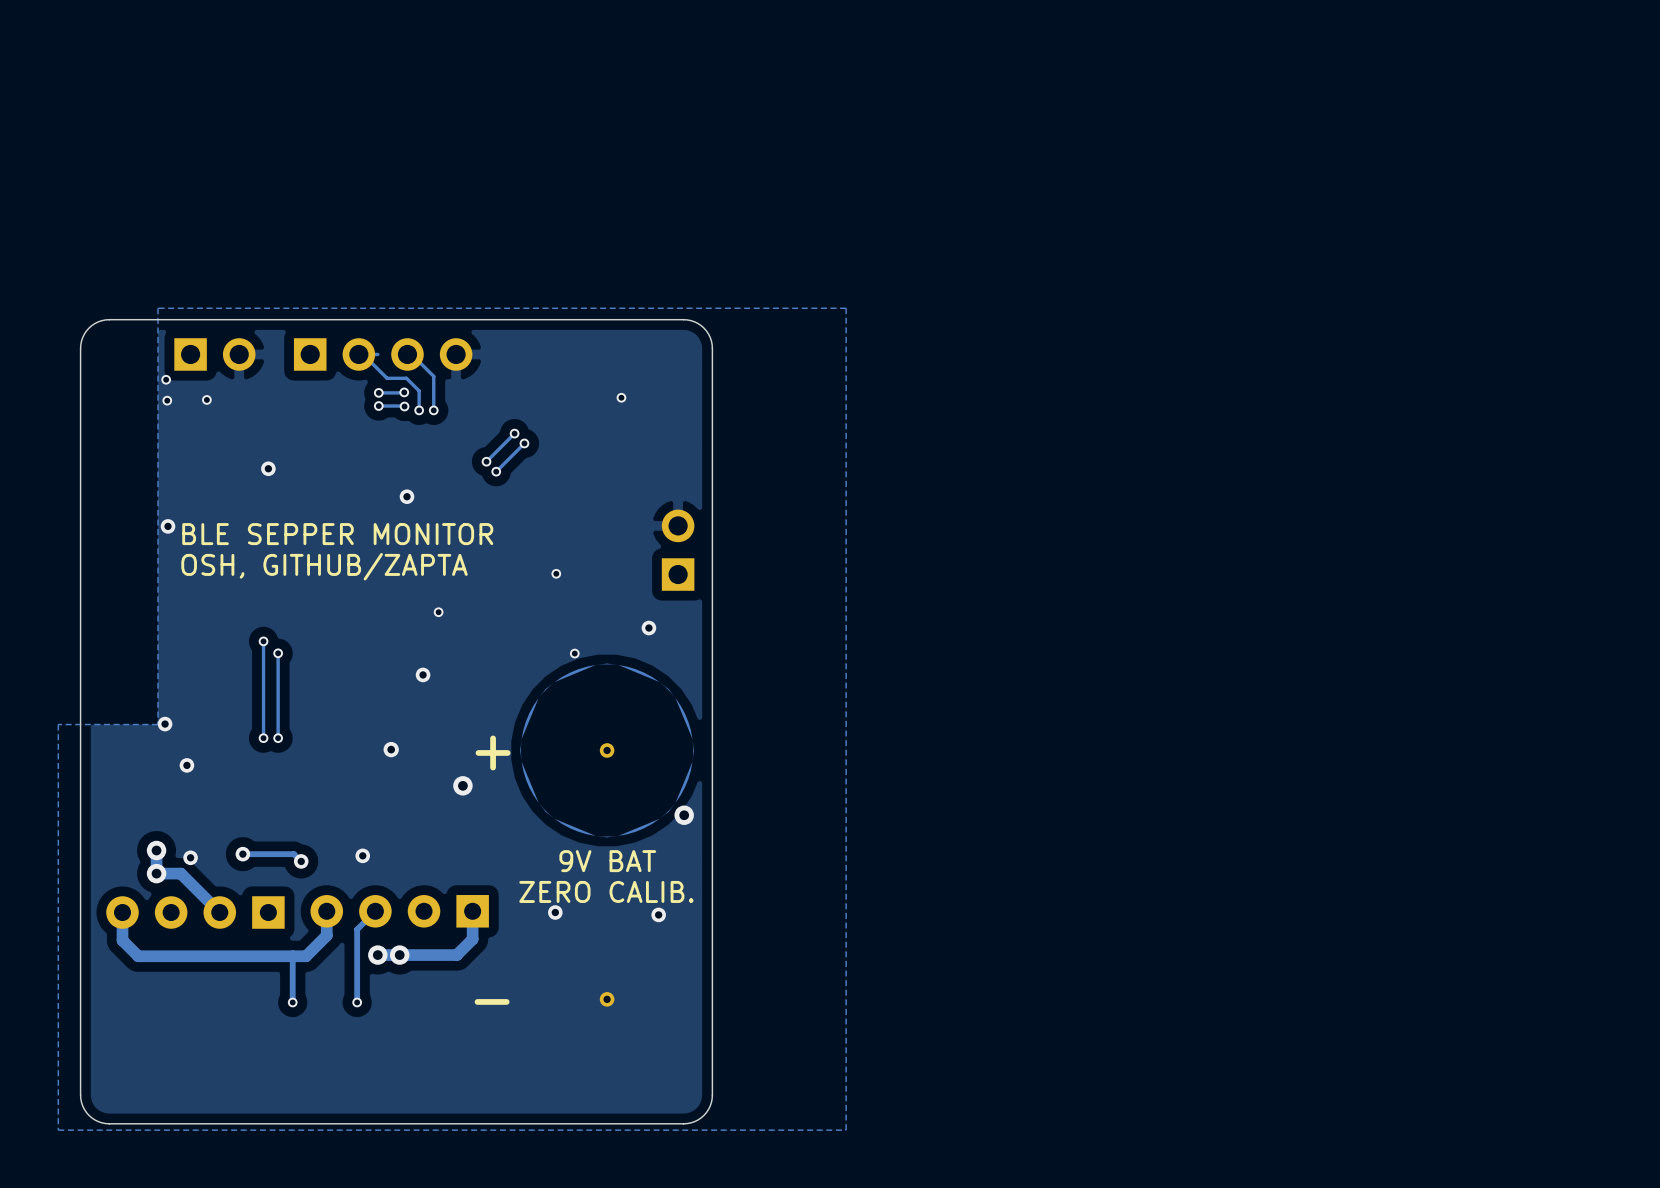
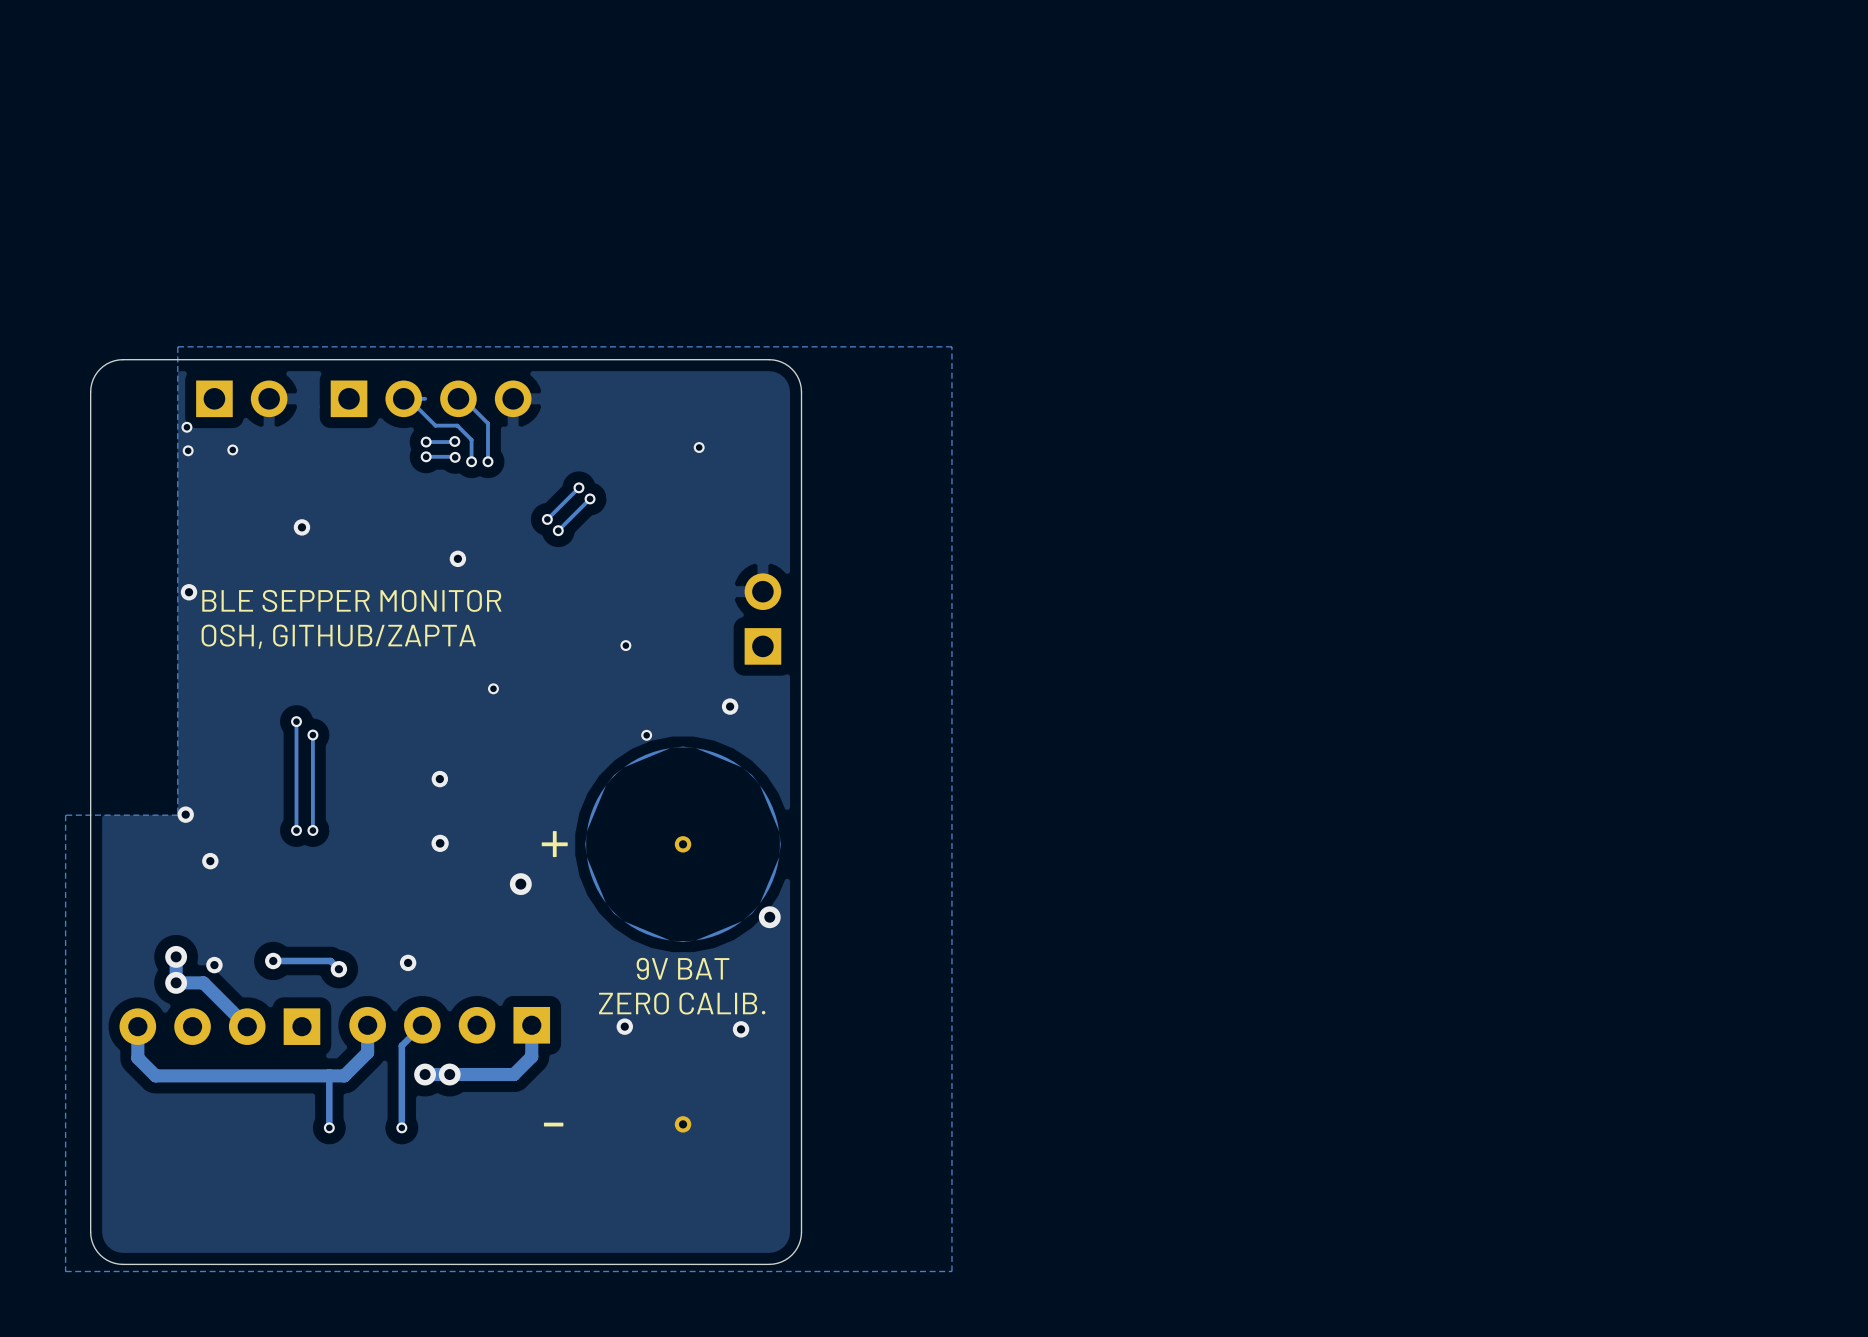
via position: (423, 674) -> (439, 779)

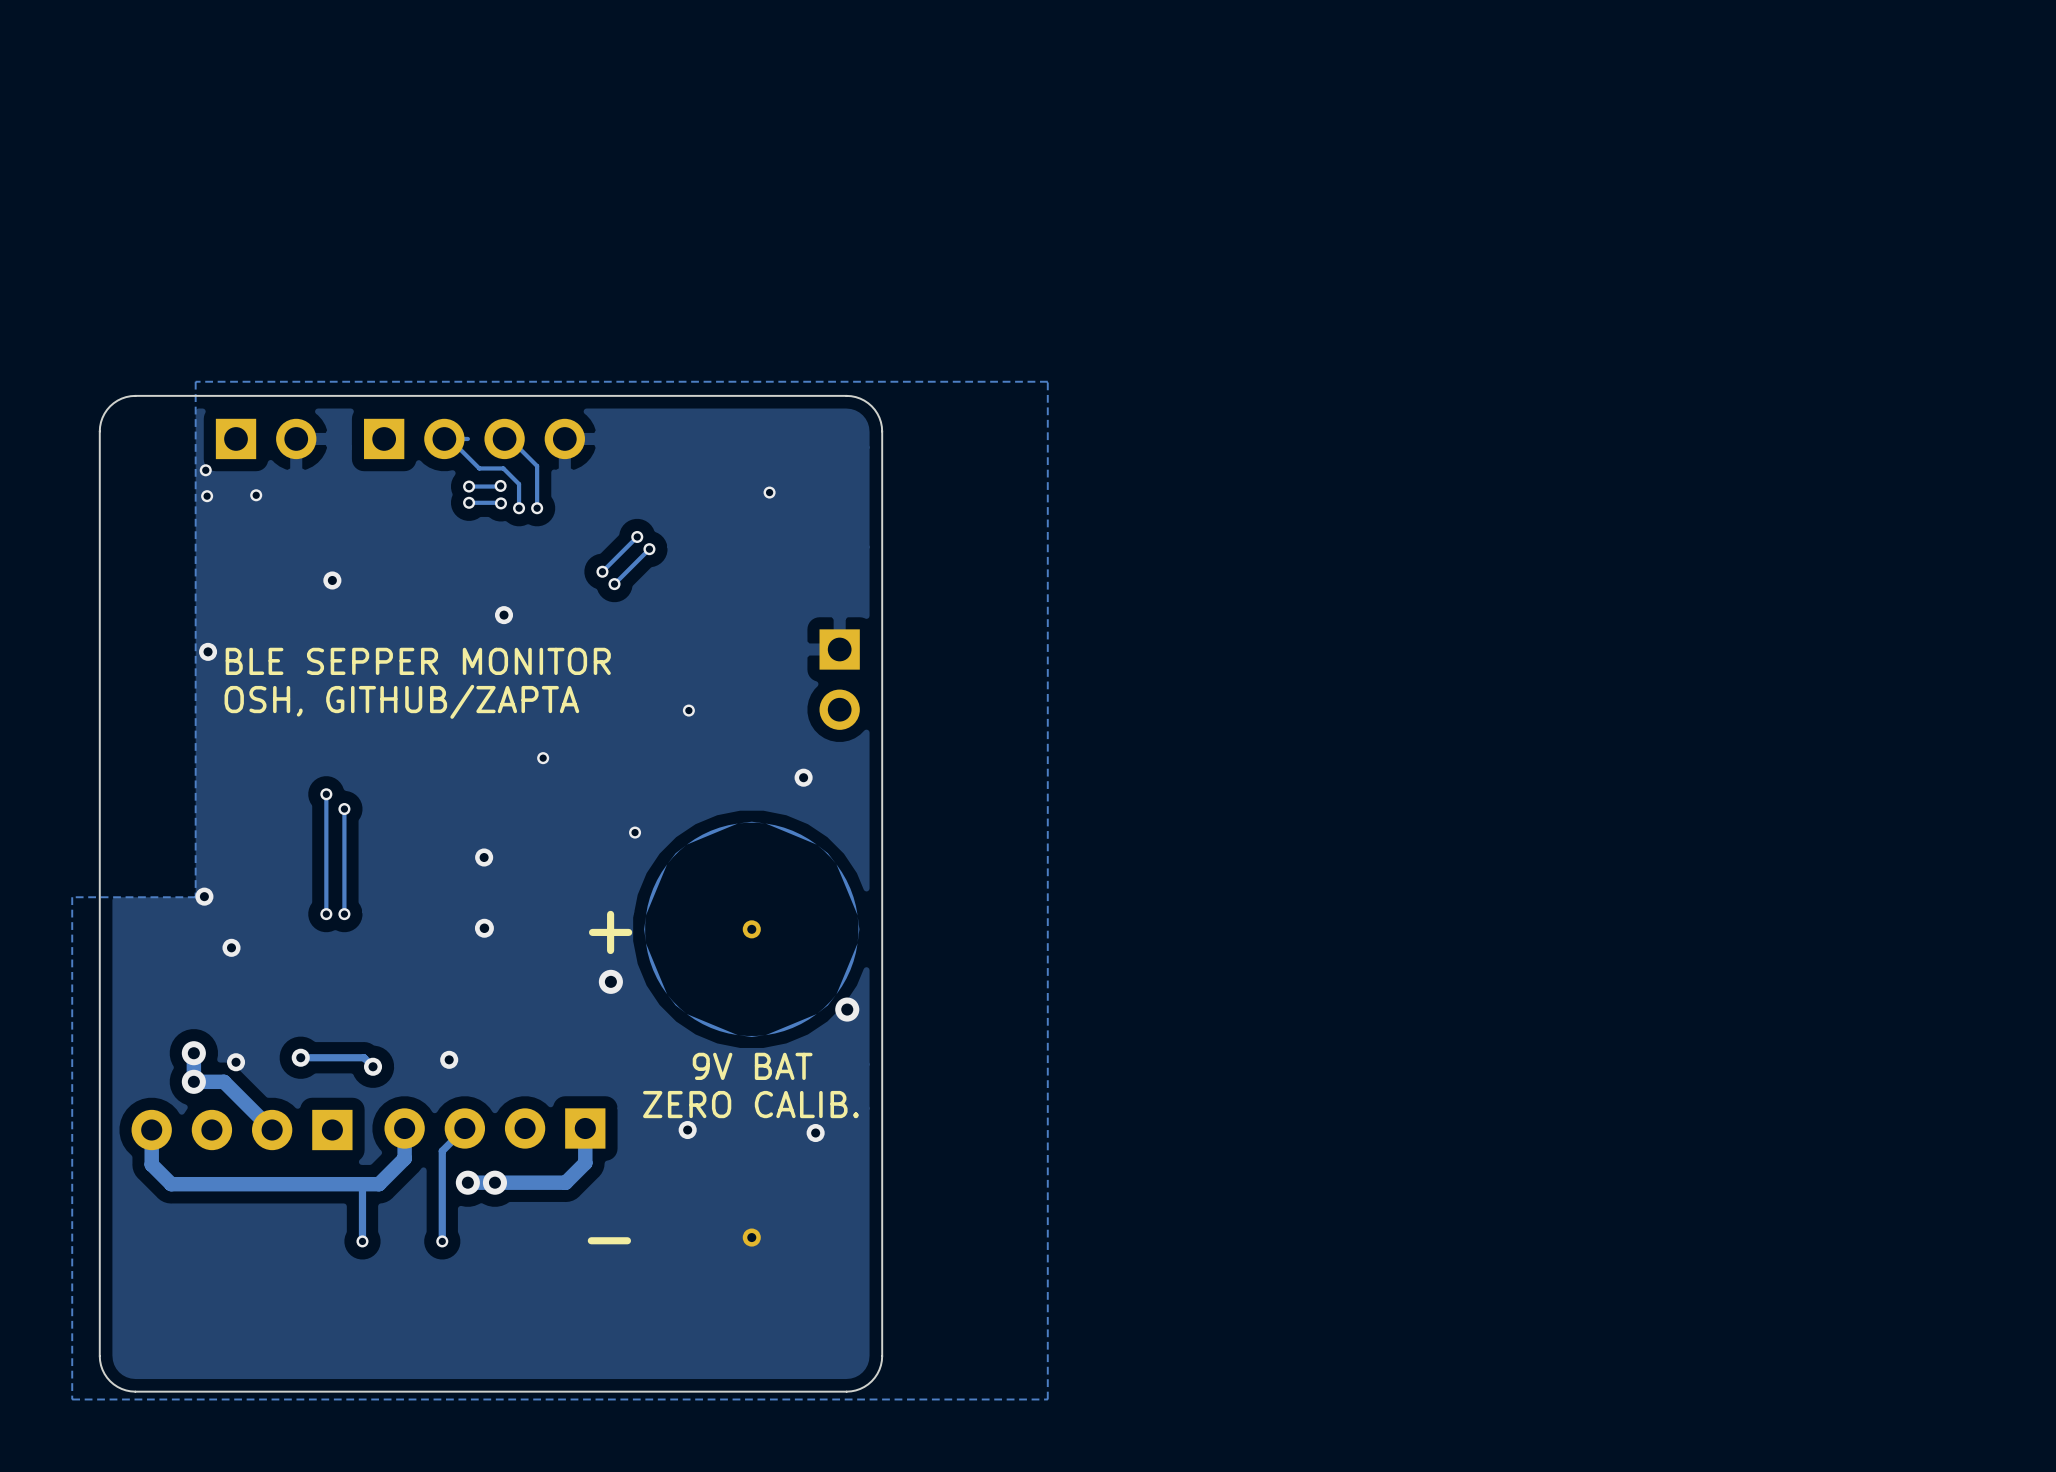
part rotation: 0° (762, 619) -> 180° (839, 679)
via position: (646, 735) -> (635, 832)
via position: (520, 884) -> (610, 981)

